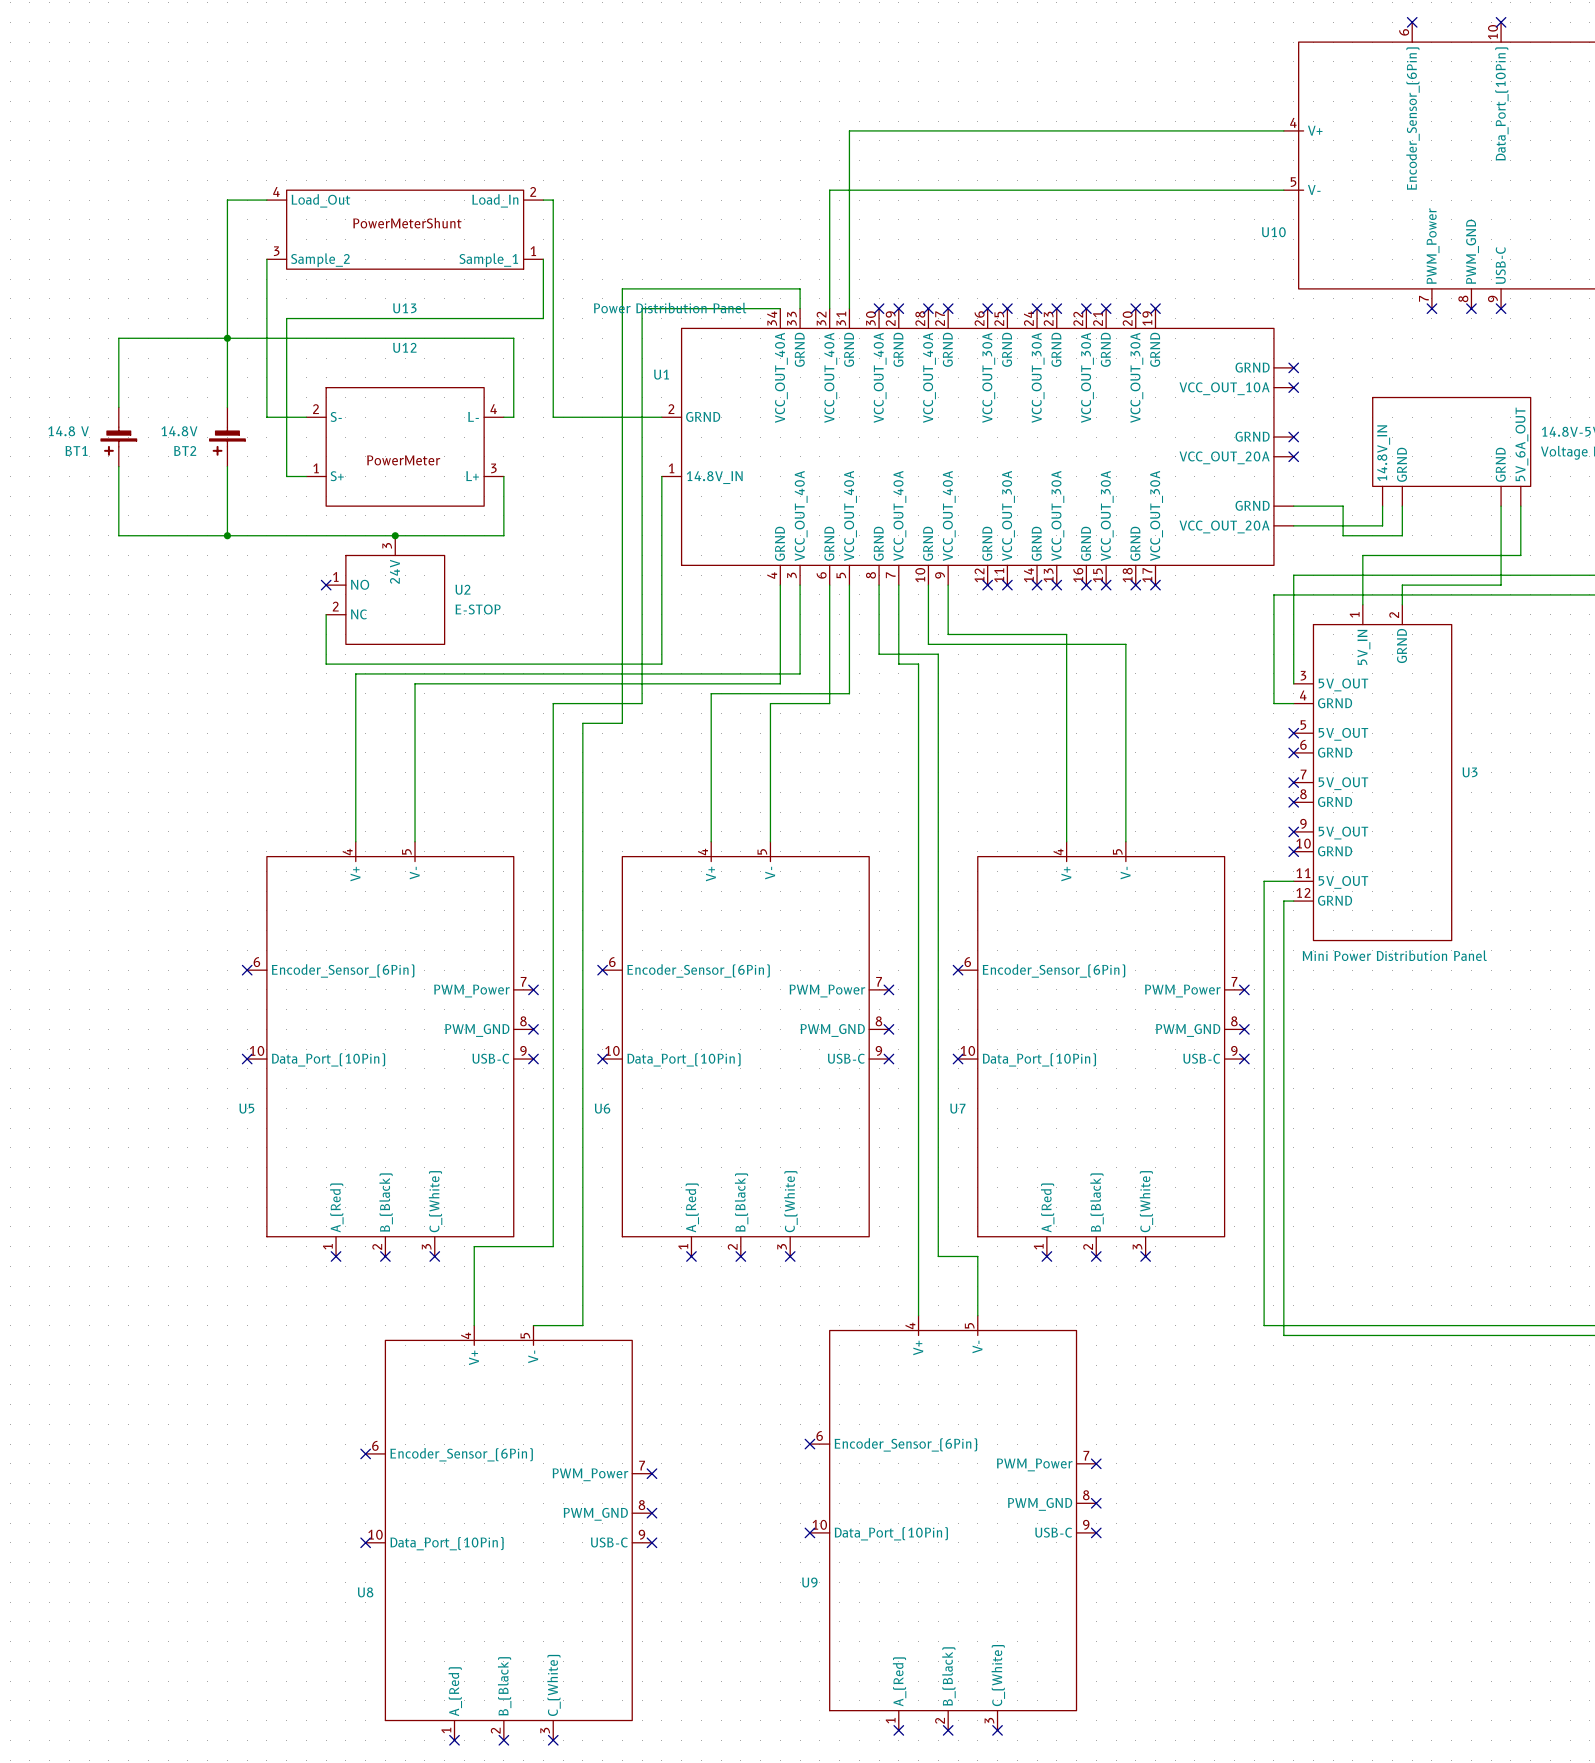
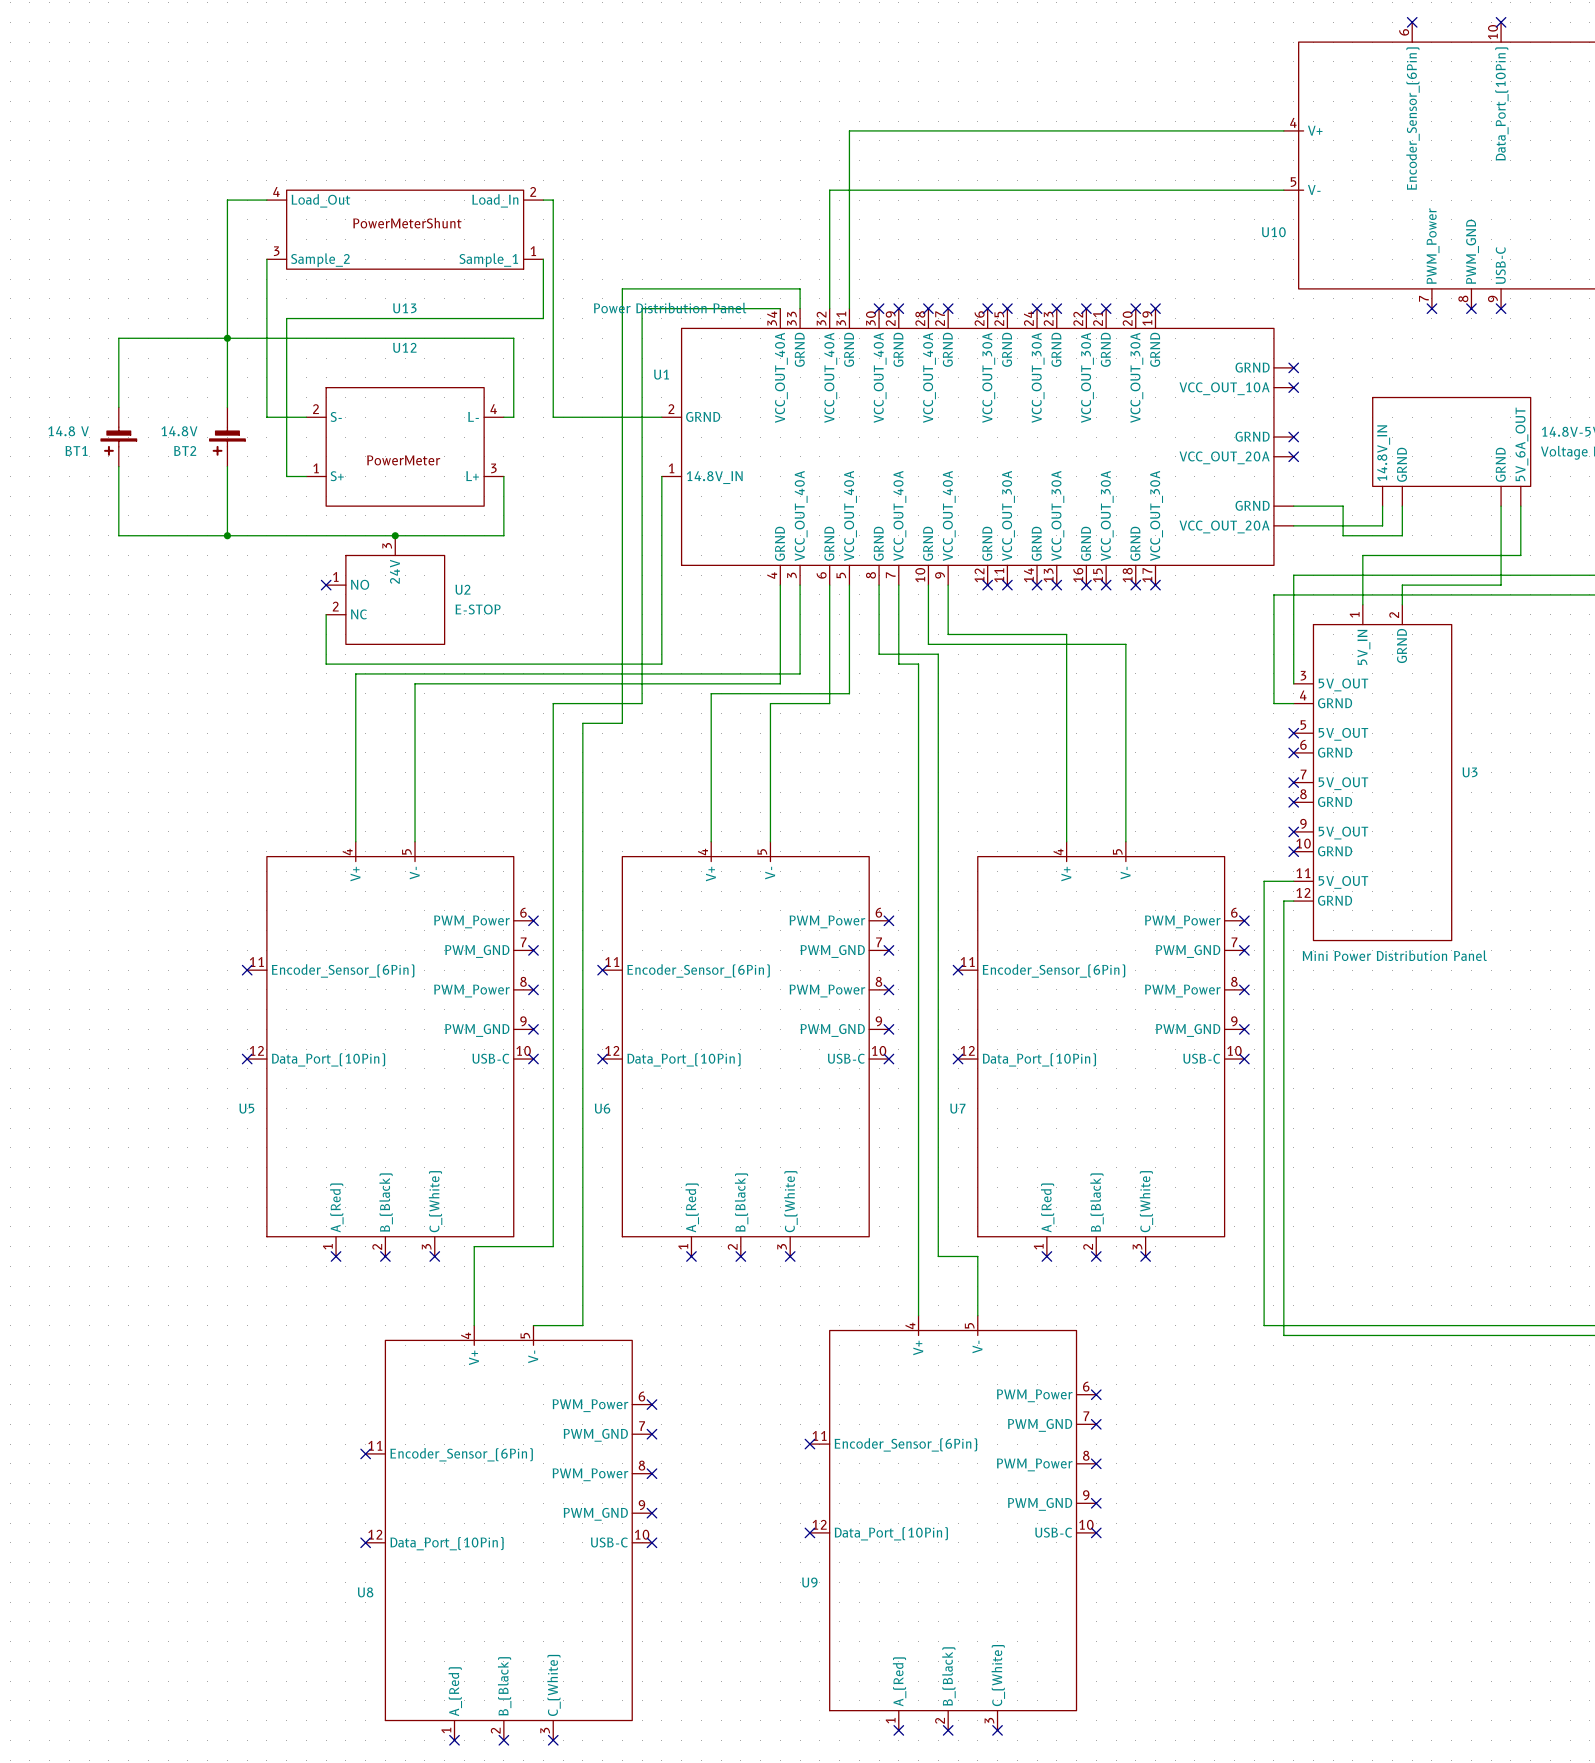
U5 symbol: [247, 841, 534, 1257] -> [247, 841, 534, 1257]
U6 symbol: [602, 841, 889, 1257] -> [602, 841, 889, 1257]
U7 symbol: [958, 841, 1245, 1257] -> [958, 841, 1245, 1257]
no-connect mark: none -> (533, 920)
no-connect mark: none -> (888, 920)
no-connect mark: none -> (1244, 920)
no-connect mark: none -> (533, 950)
no-connect mark: none -> (888, 950)
no-connect mark: none -> (1244, 950)
U9 symbol: [809, 1315, 1097, 1731] -> [809, 1315, 1097, 1731]
U8 symbol: [365, 1325, 652, 1741] -> [365, 1325, 652, 1741]
no-connect mark: none -> (1096, 1394)
no-connect mark: none -> (651, 1404)
no-connect mark: none -> (1096, 1424)
no-connect mark: none -> (651, 1434)

